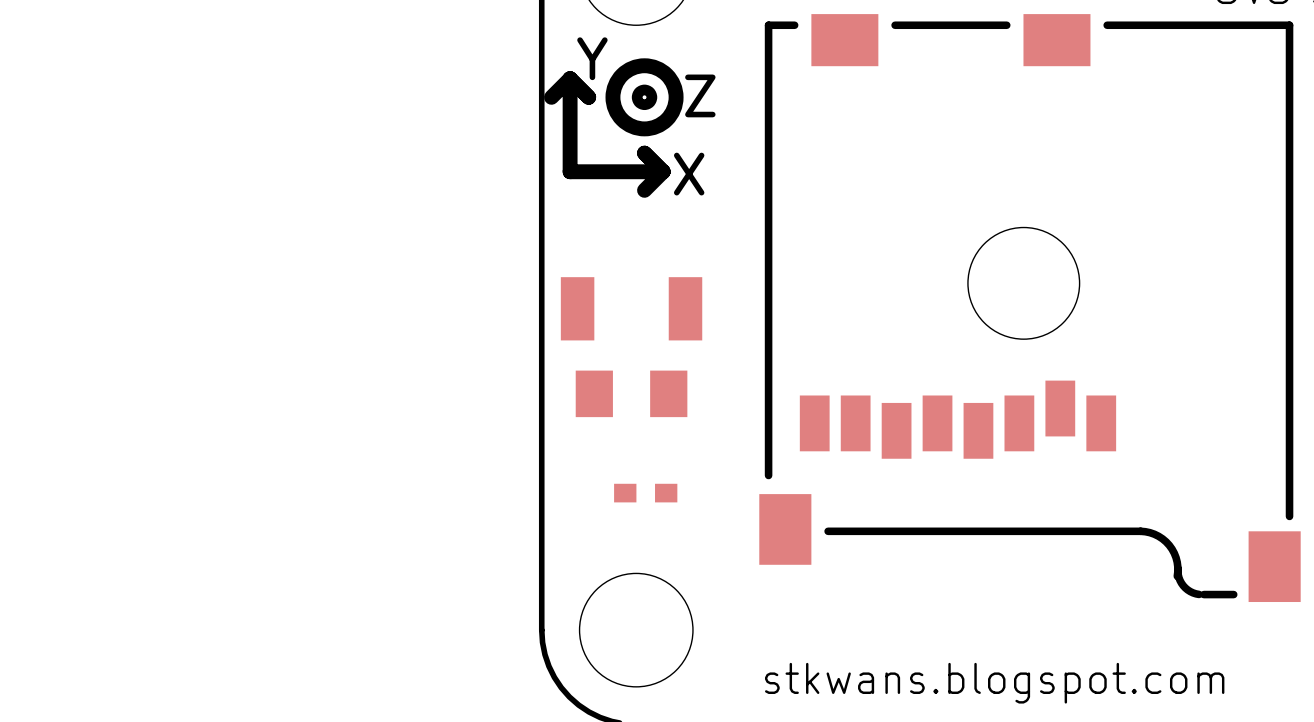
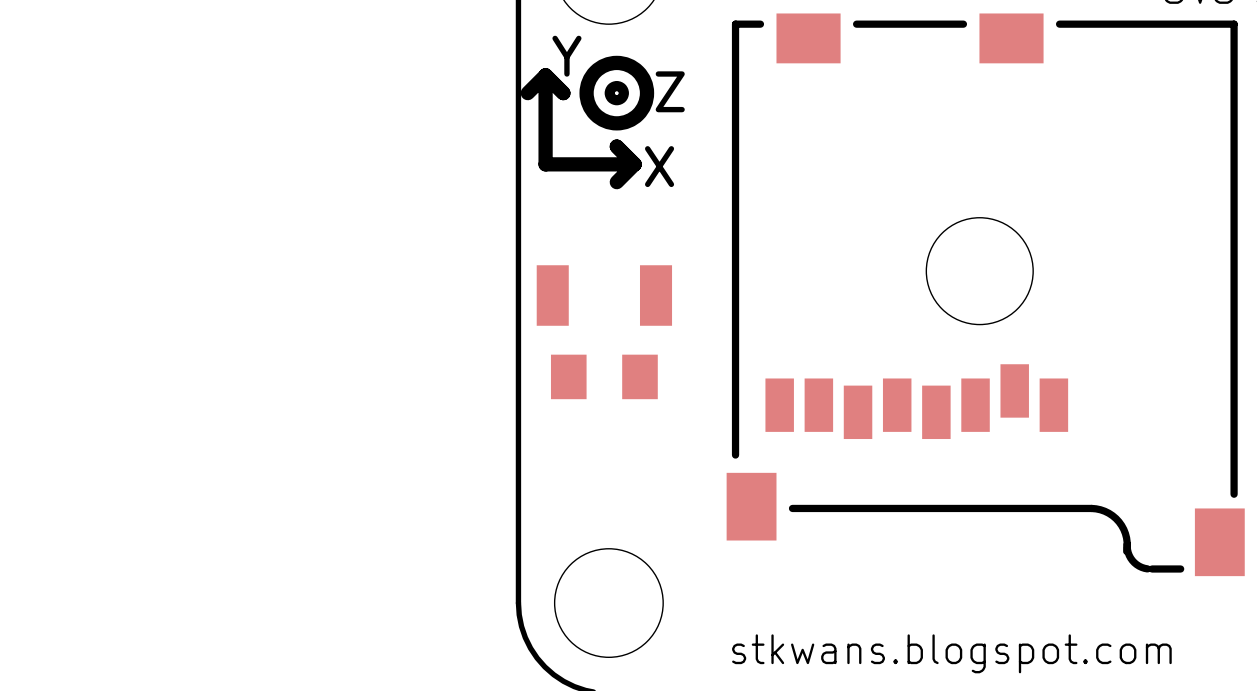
part: (645, 493) -> none

